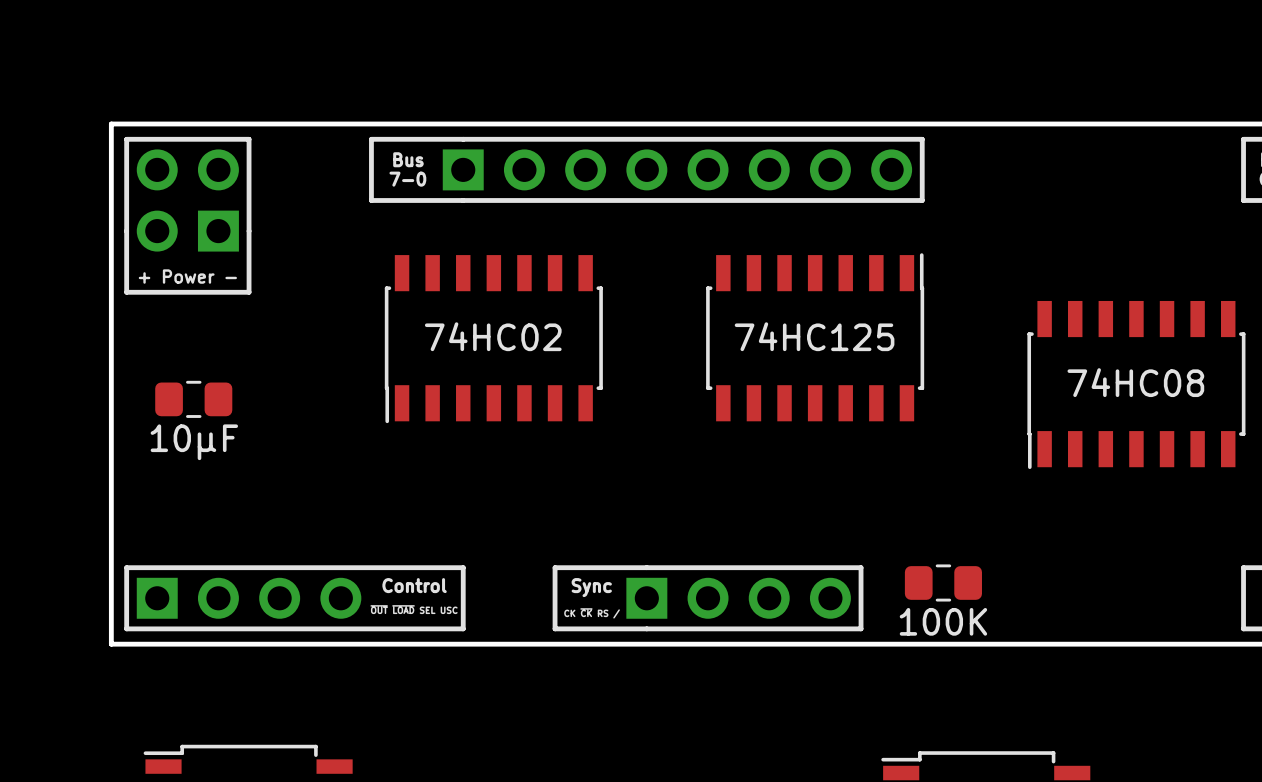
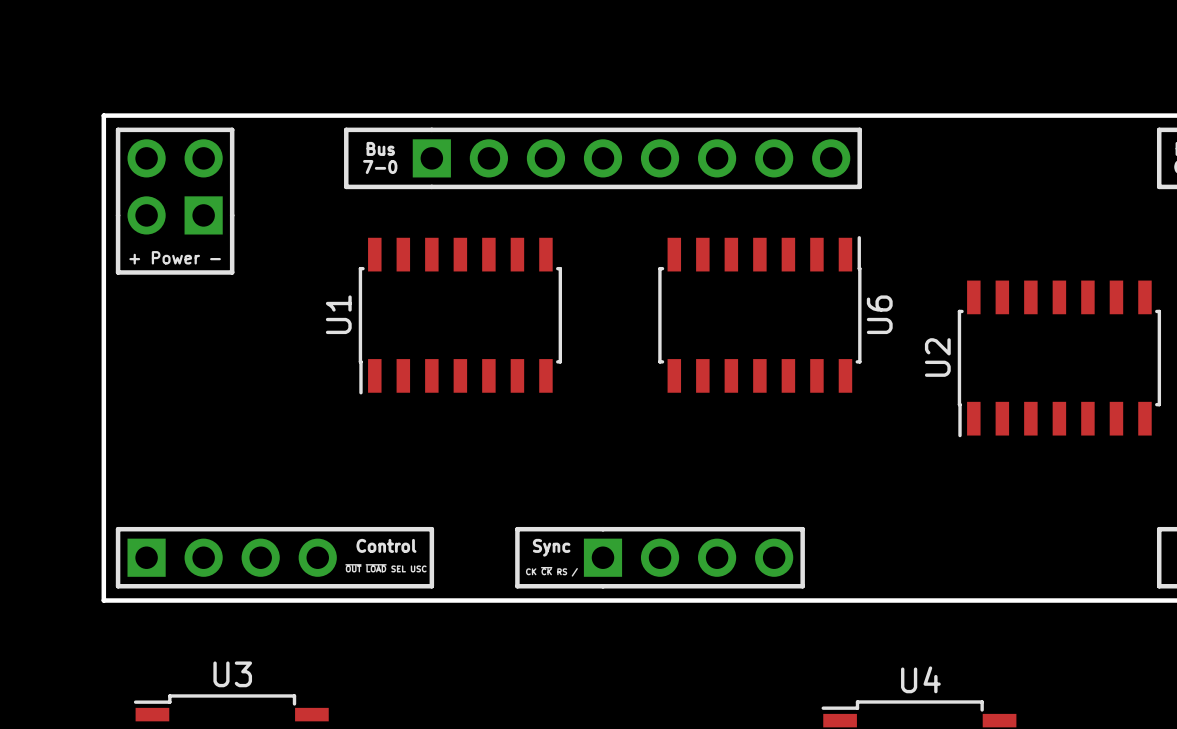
U1 value: 74HC02 (493, 336) -> none
U6 value: 74HC125 (814, 336) -> none
U1 name: none -> U1 (338, 314)
U6 name: none -> U6 (879, 314)
U2 value: 74HC08 (1135, 382) -> none
U2 name: none -> U2 (937, 357)
part: 10μF (193, 399) -> none
part: 100K (943, 582) -> none
U3 name: none -> U3 (232, 674)
U4 name: none -> U4 (920, 679)

